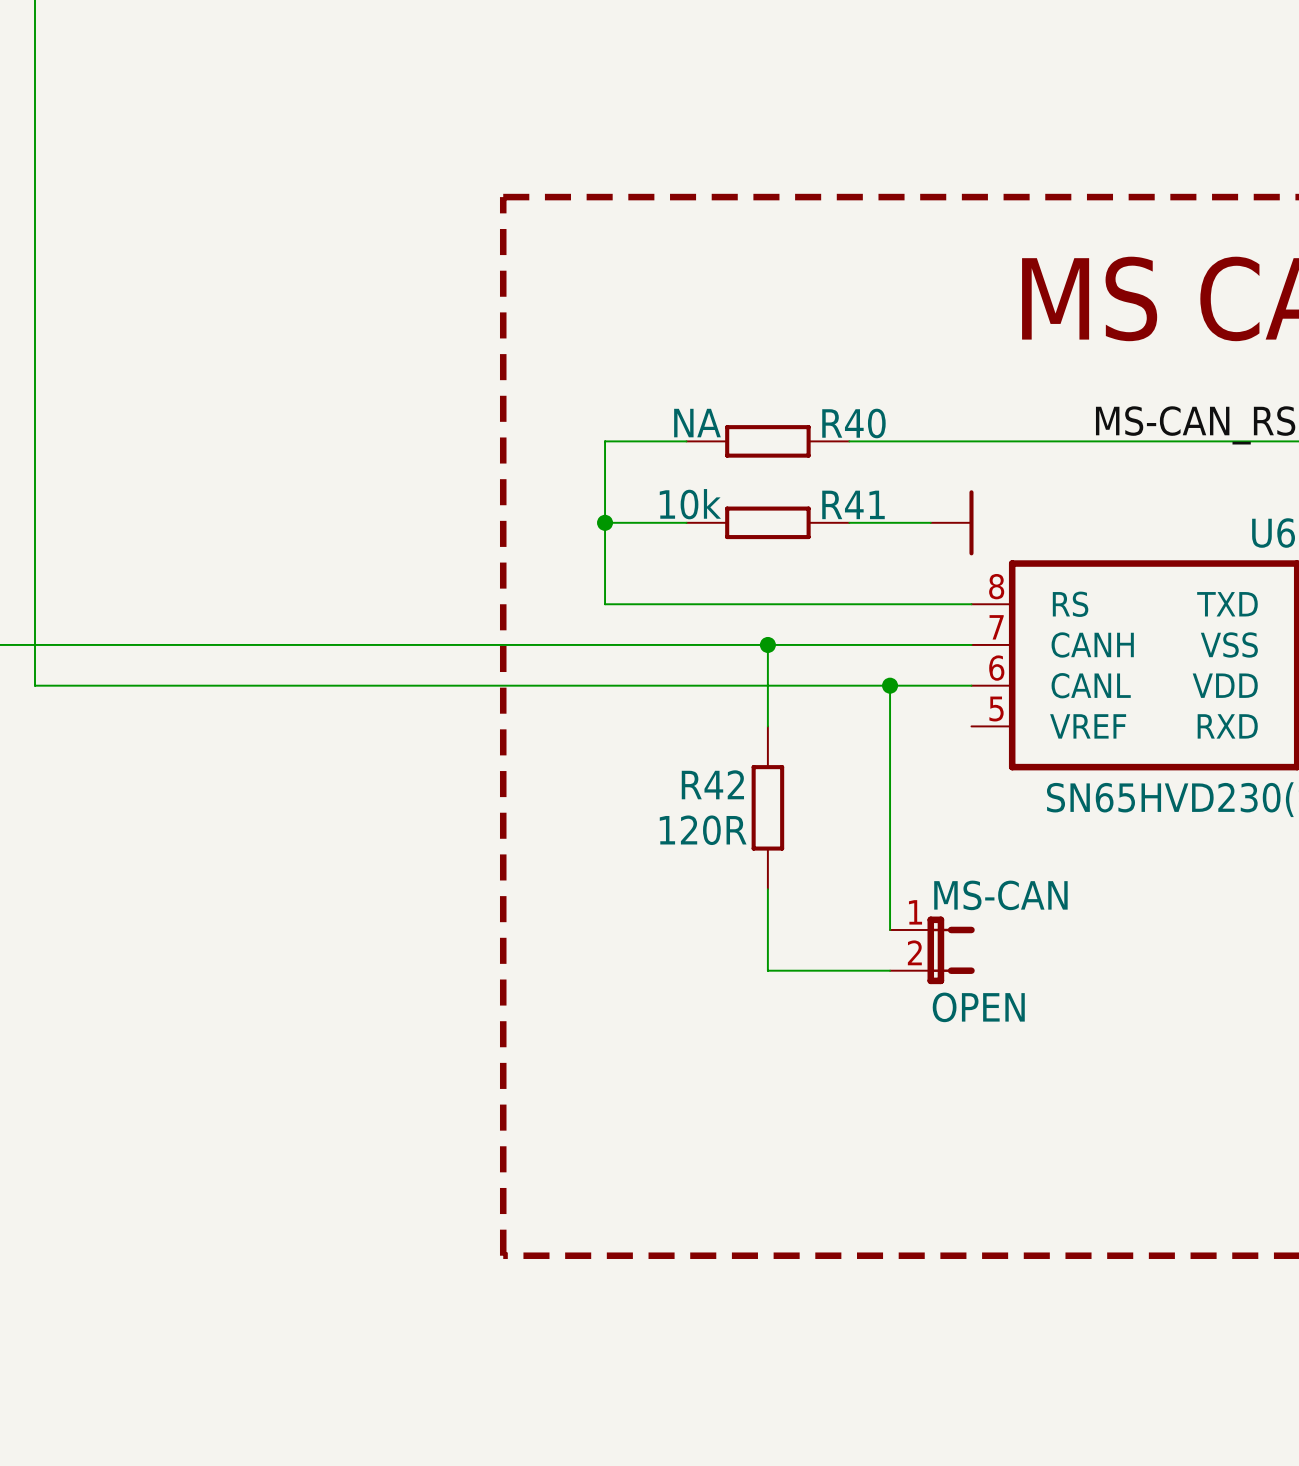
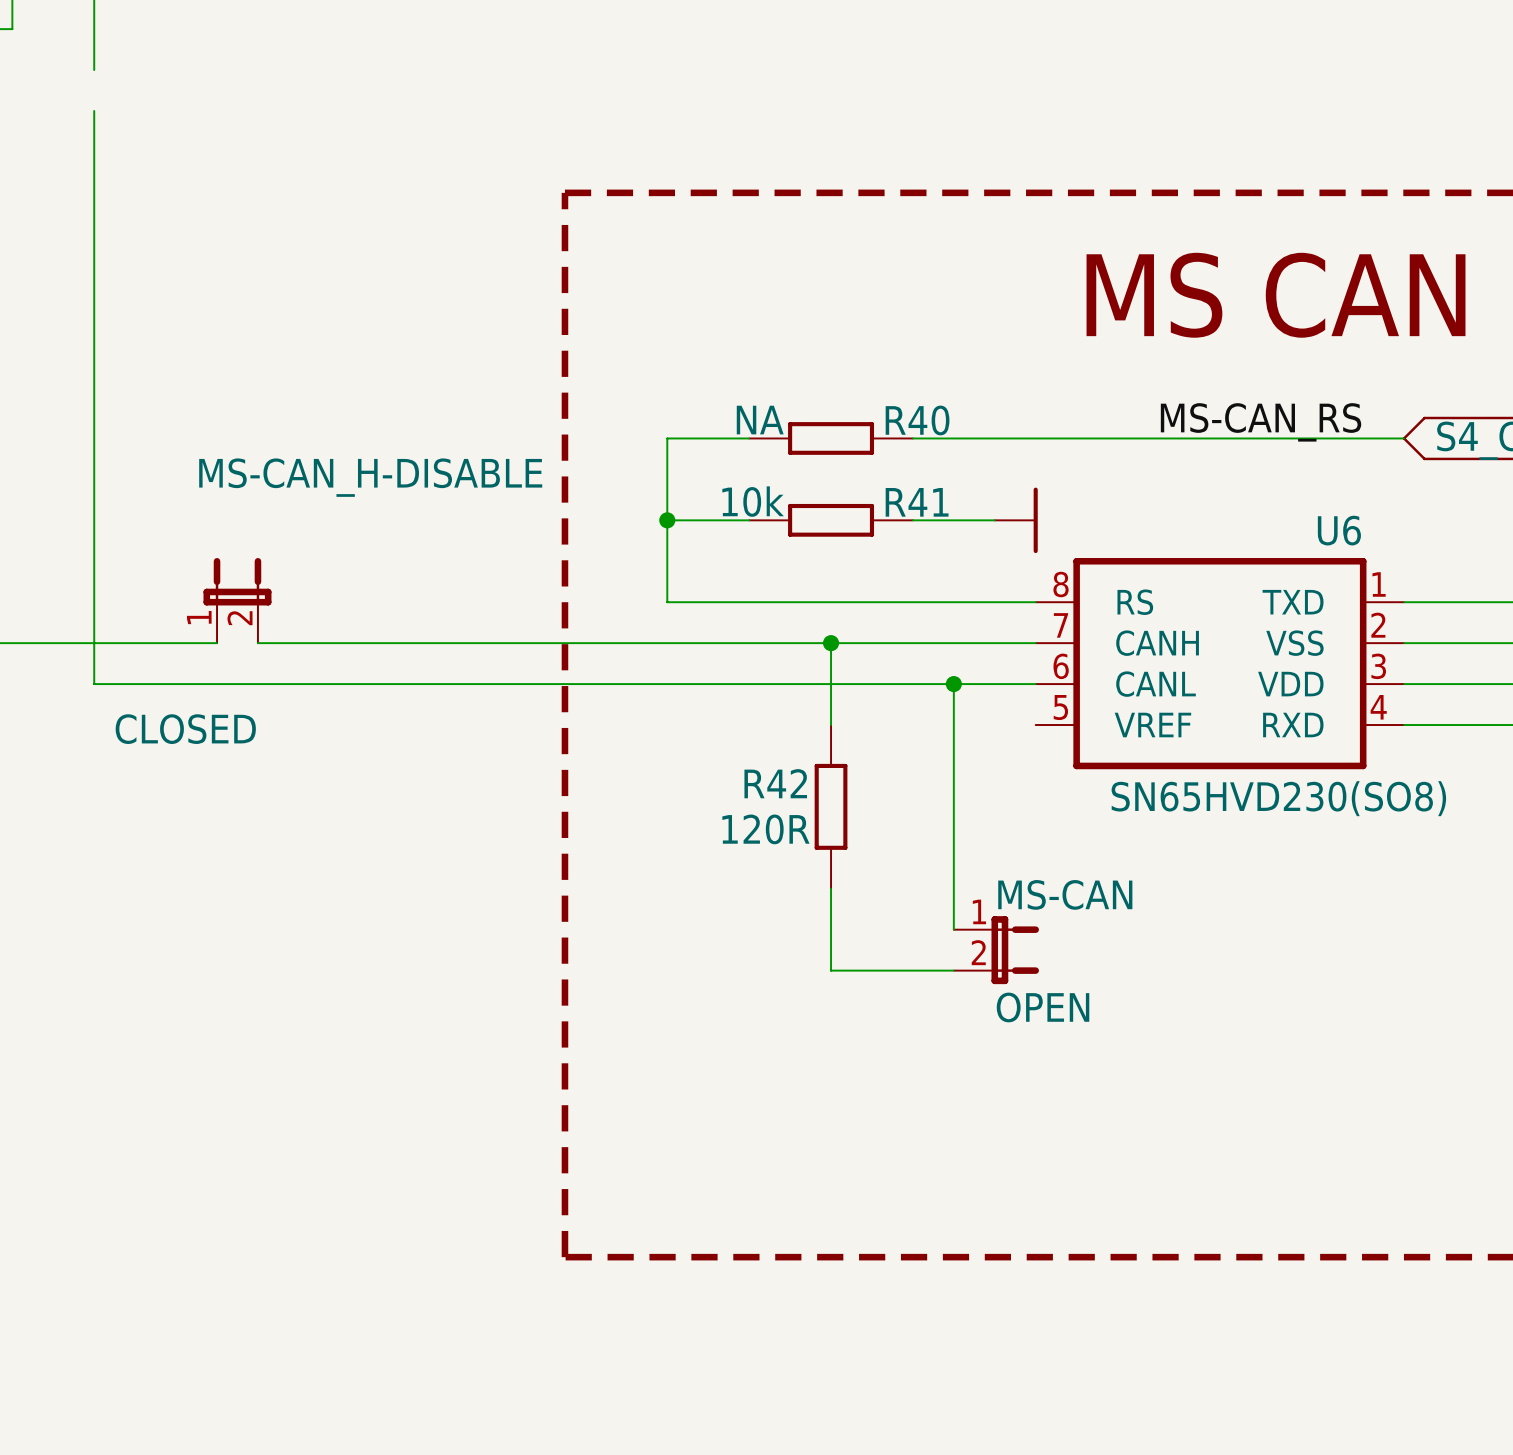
wire: (34, 74) (34, 115) -> none
MS-CAN_H-DISABLE: none -> CLOSED (237, 600)
wire: (157, 644) (197, 644) -> none

